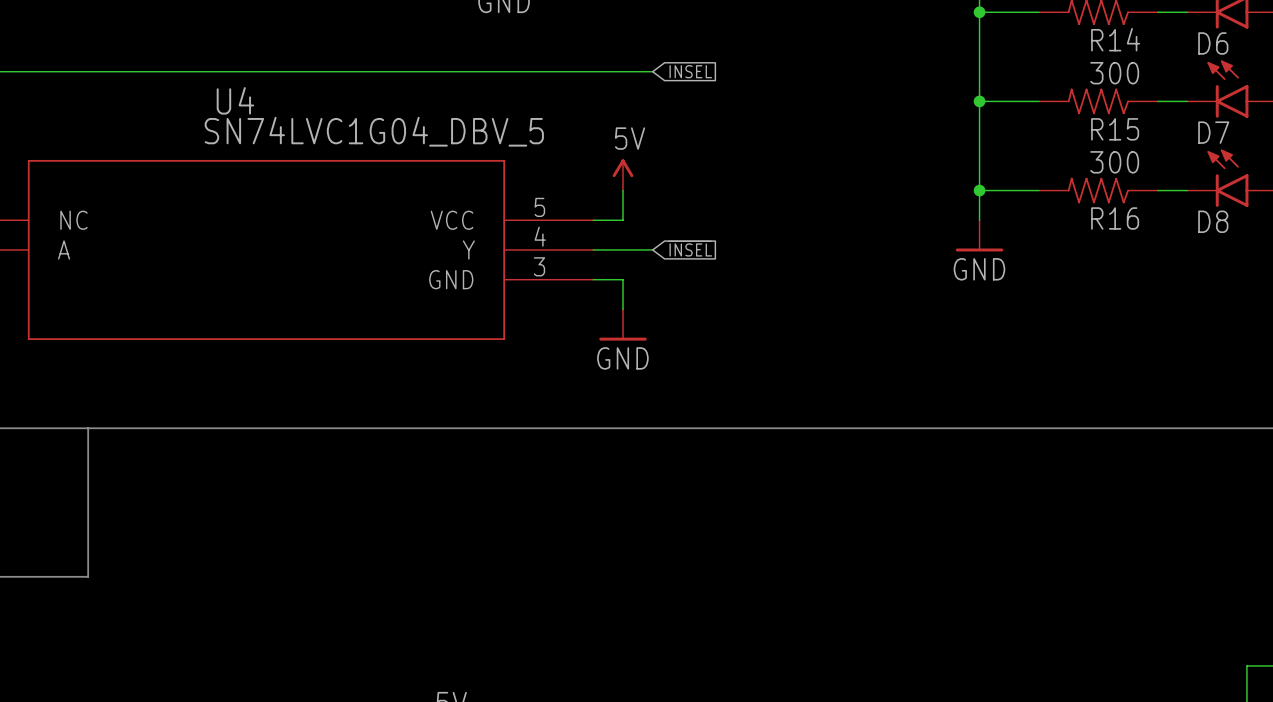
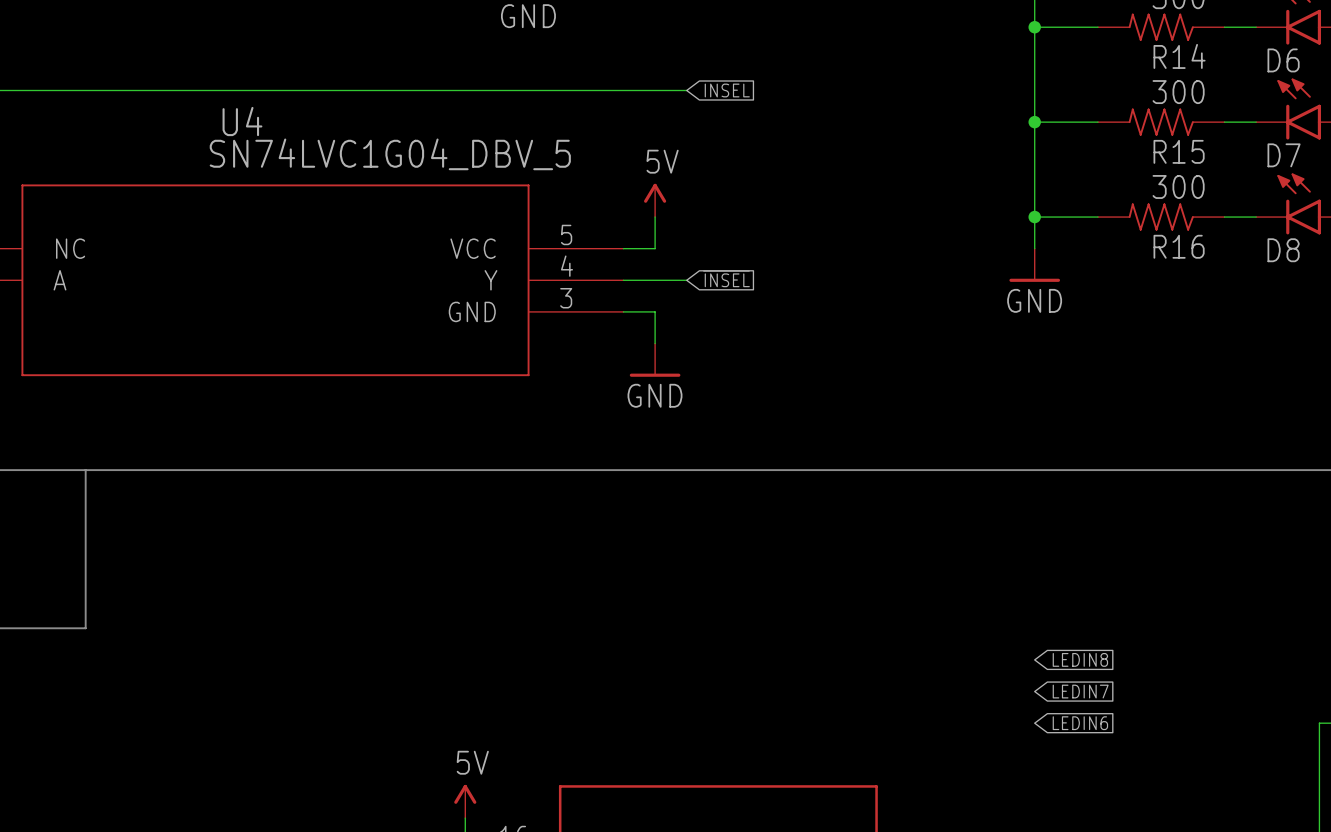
global label: none -> LEDIN8 (1080, 659)
global label: none -> LEDIN7 (1080, 691)
global label: none -> LEDIN6 (1080, 723)

